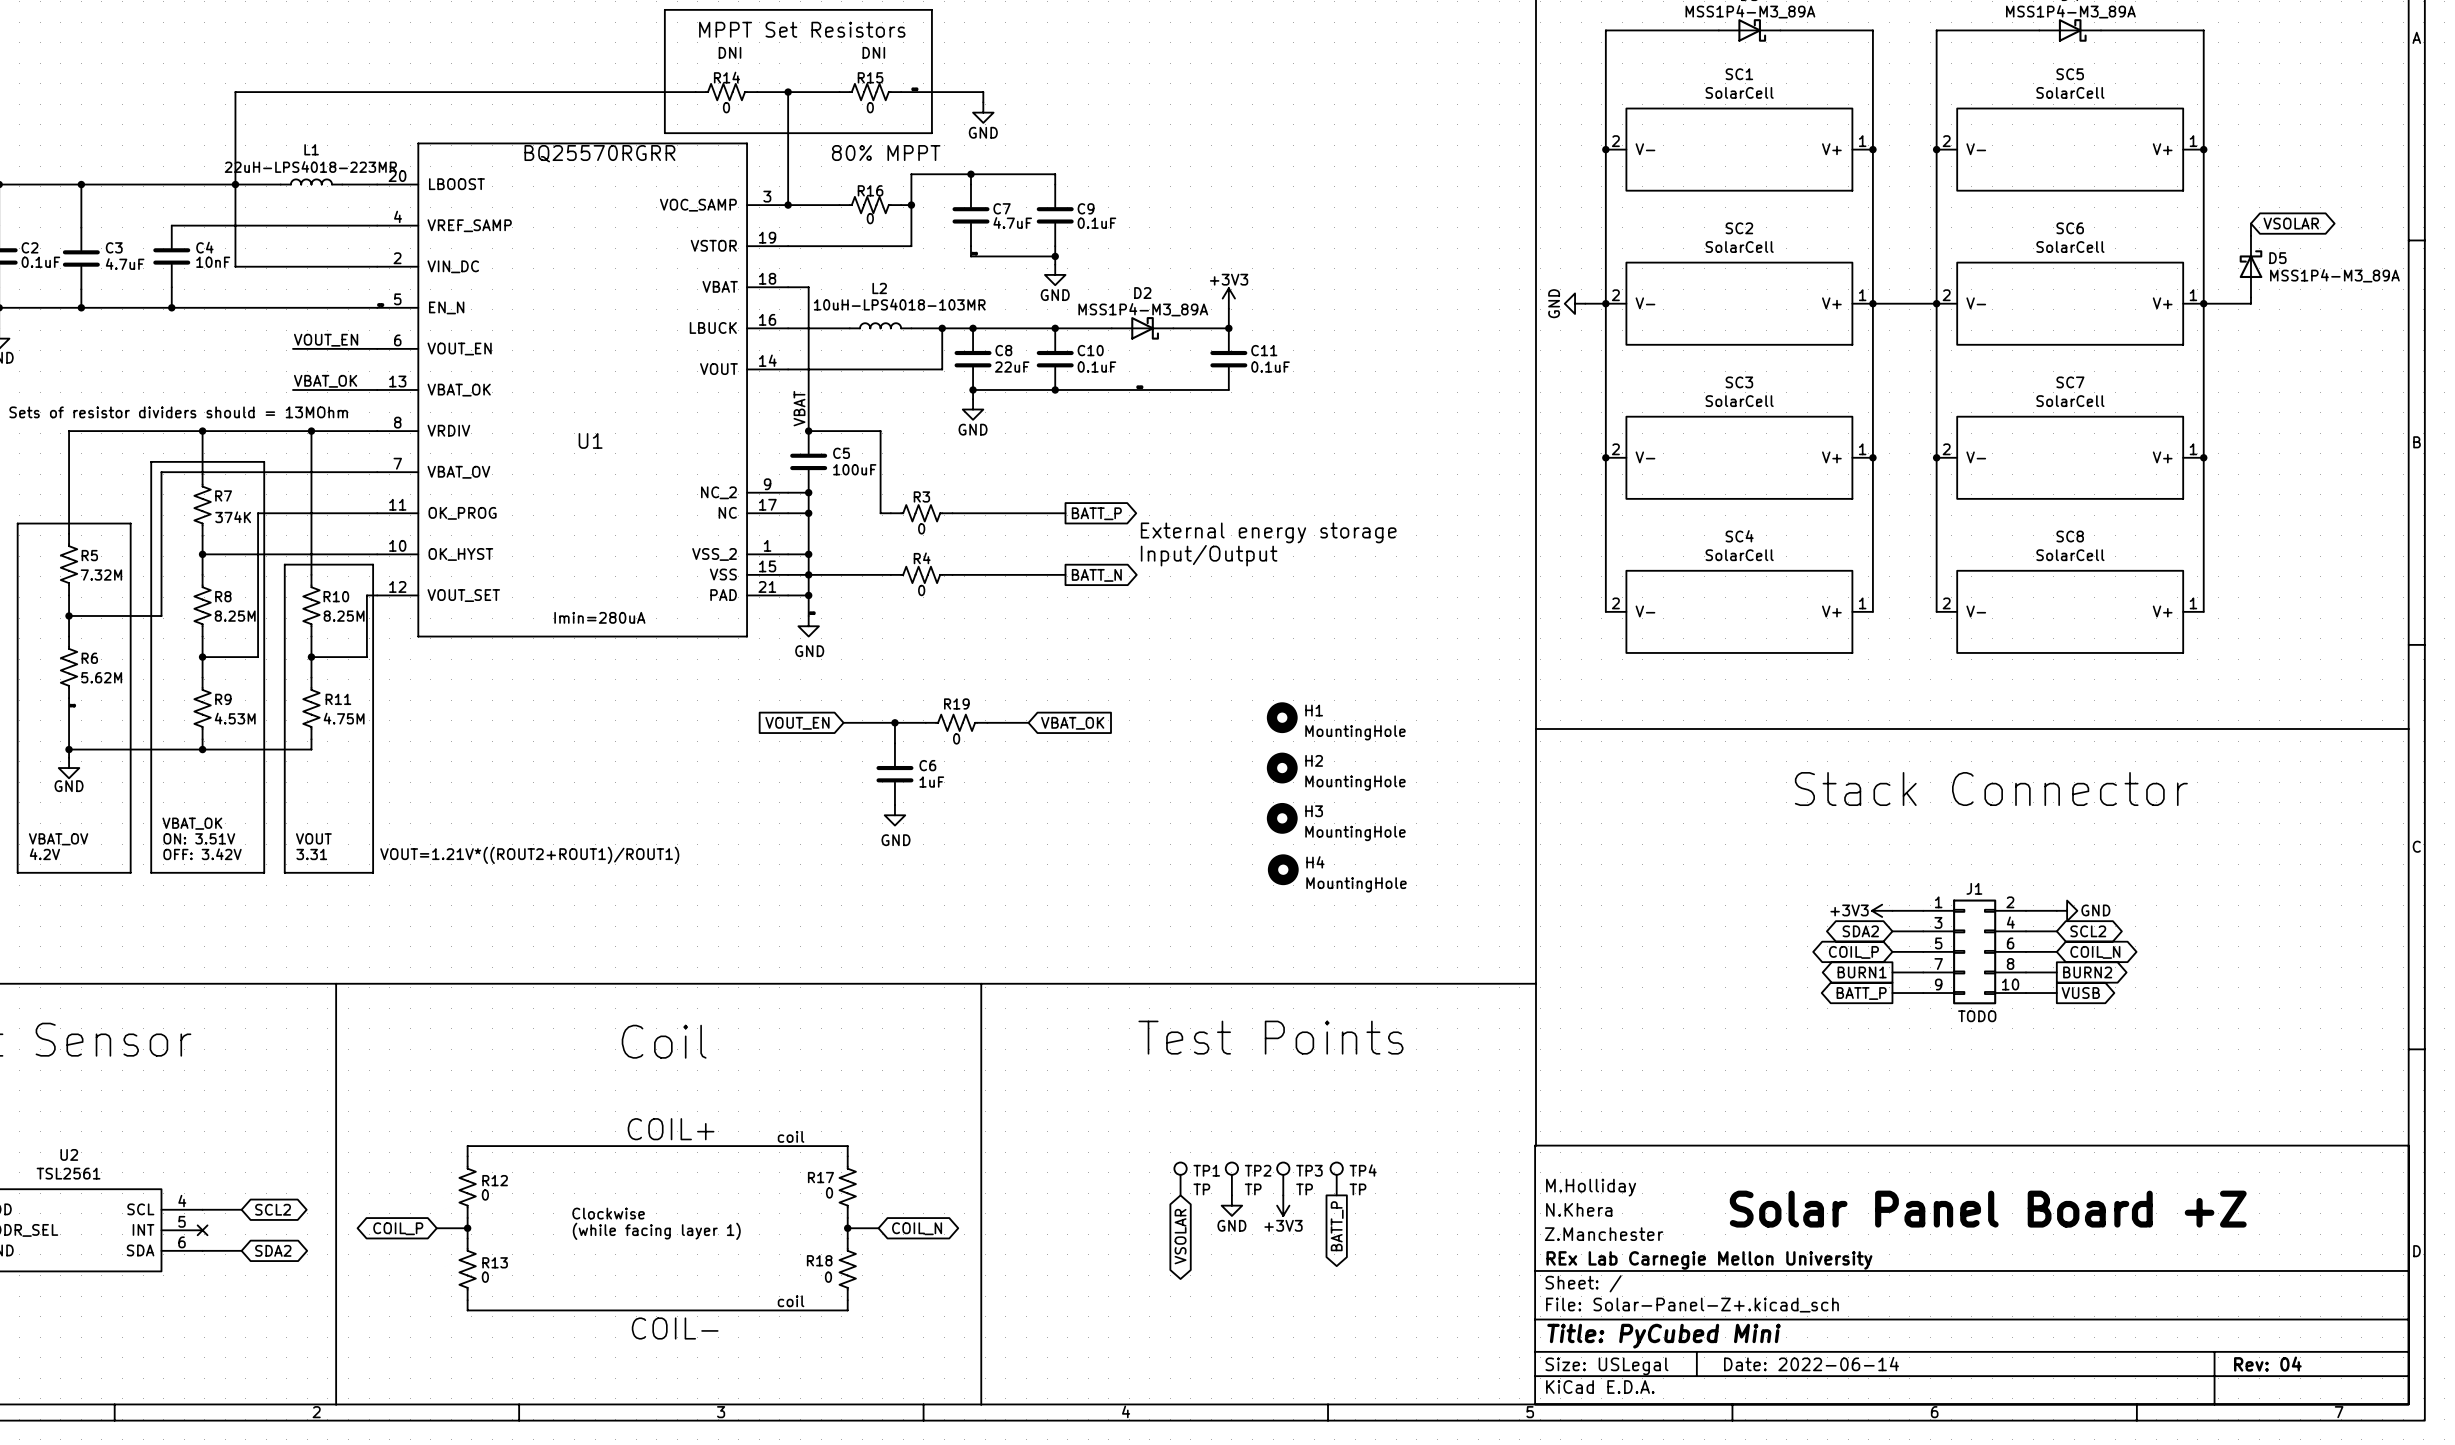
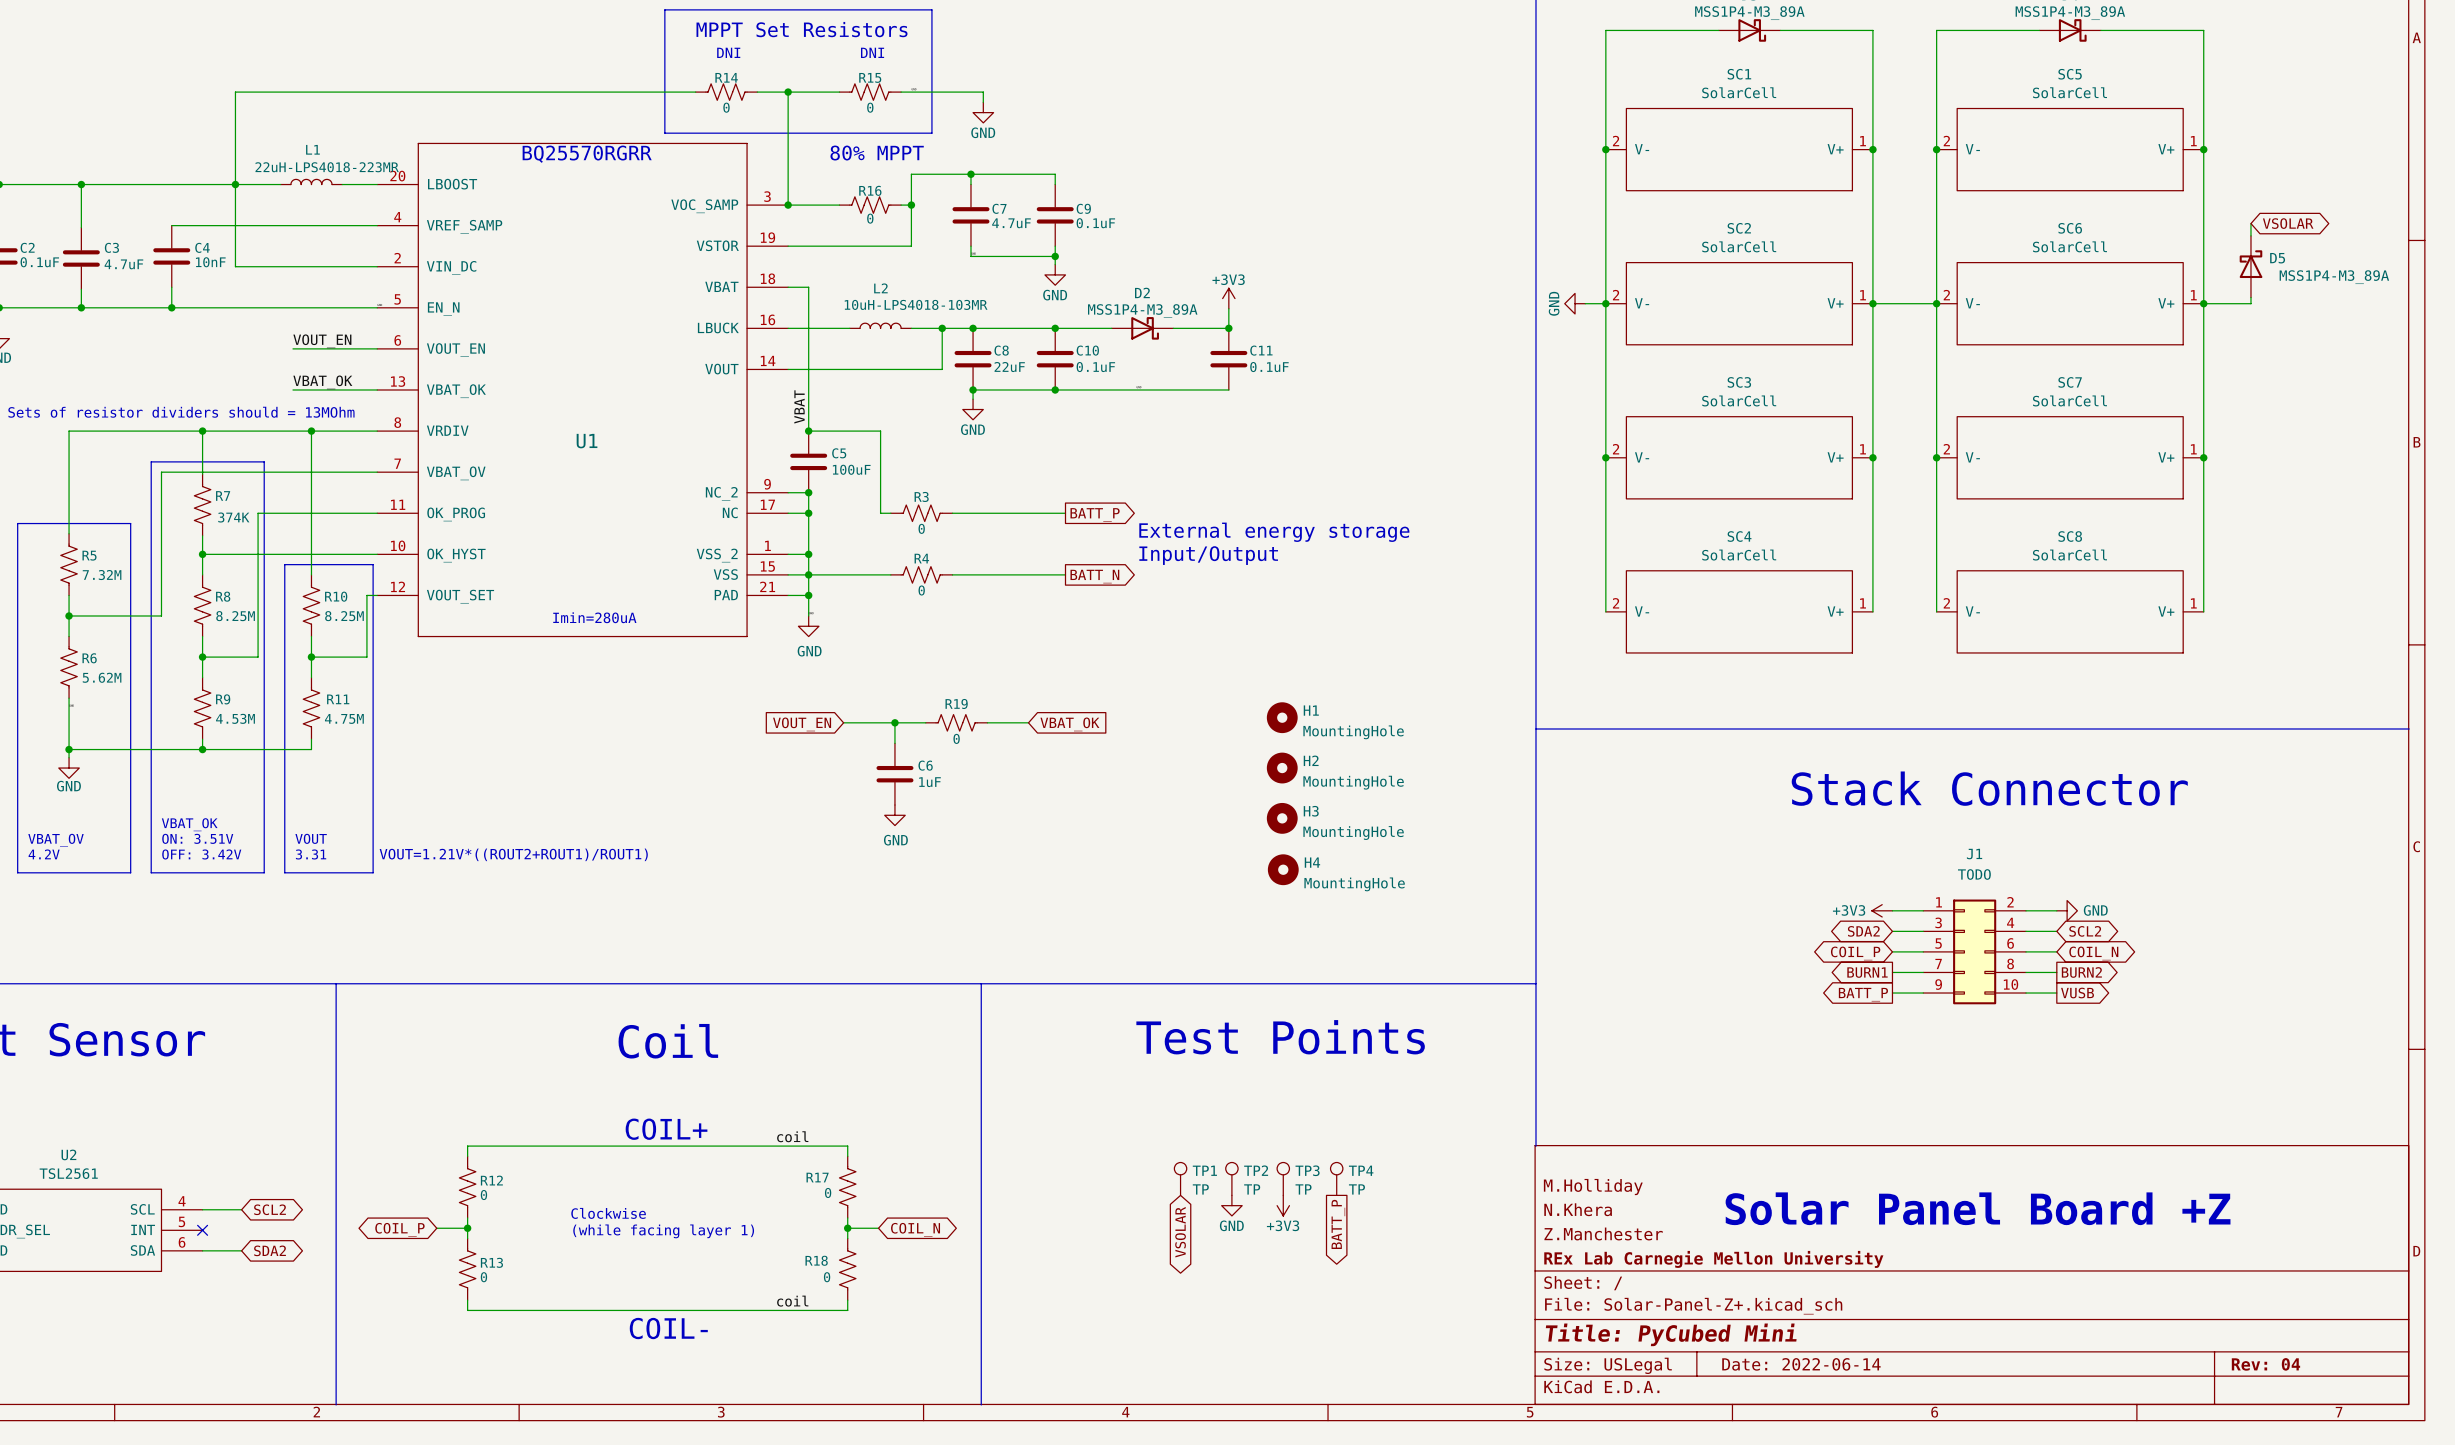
J1 name position: J1 (1974, 888) -> J1 (1974, 854)
J1 value position: TODO (1977, 1016) -> TODO (1974, 874)

